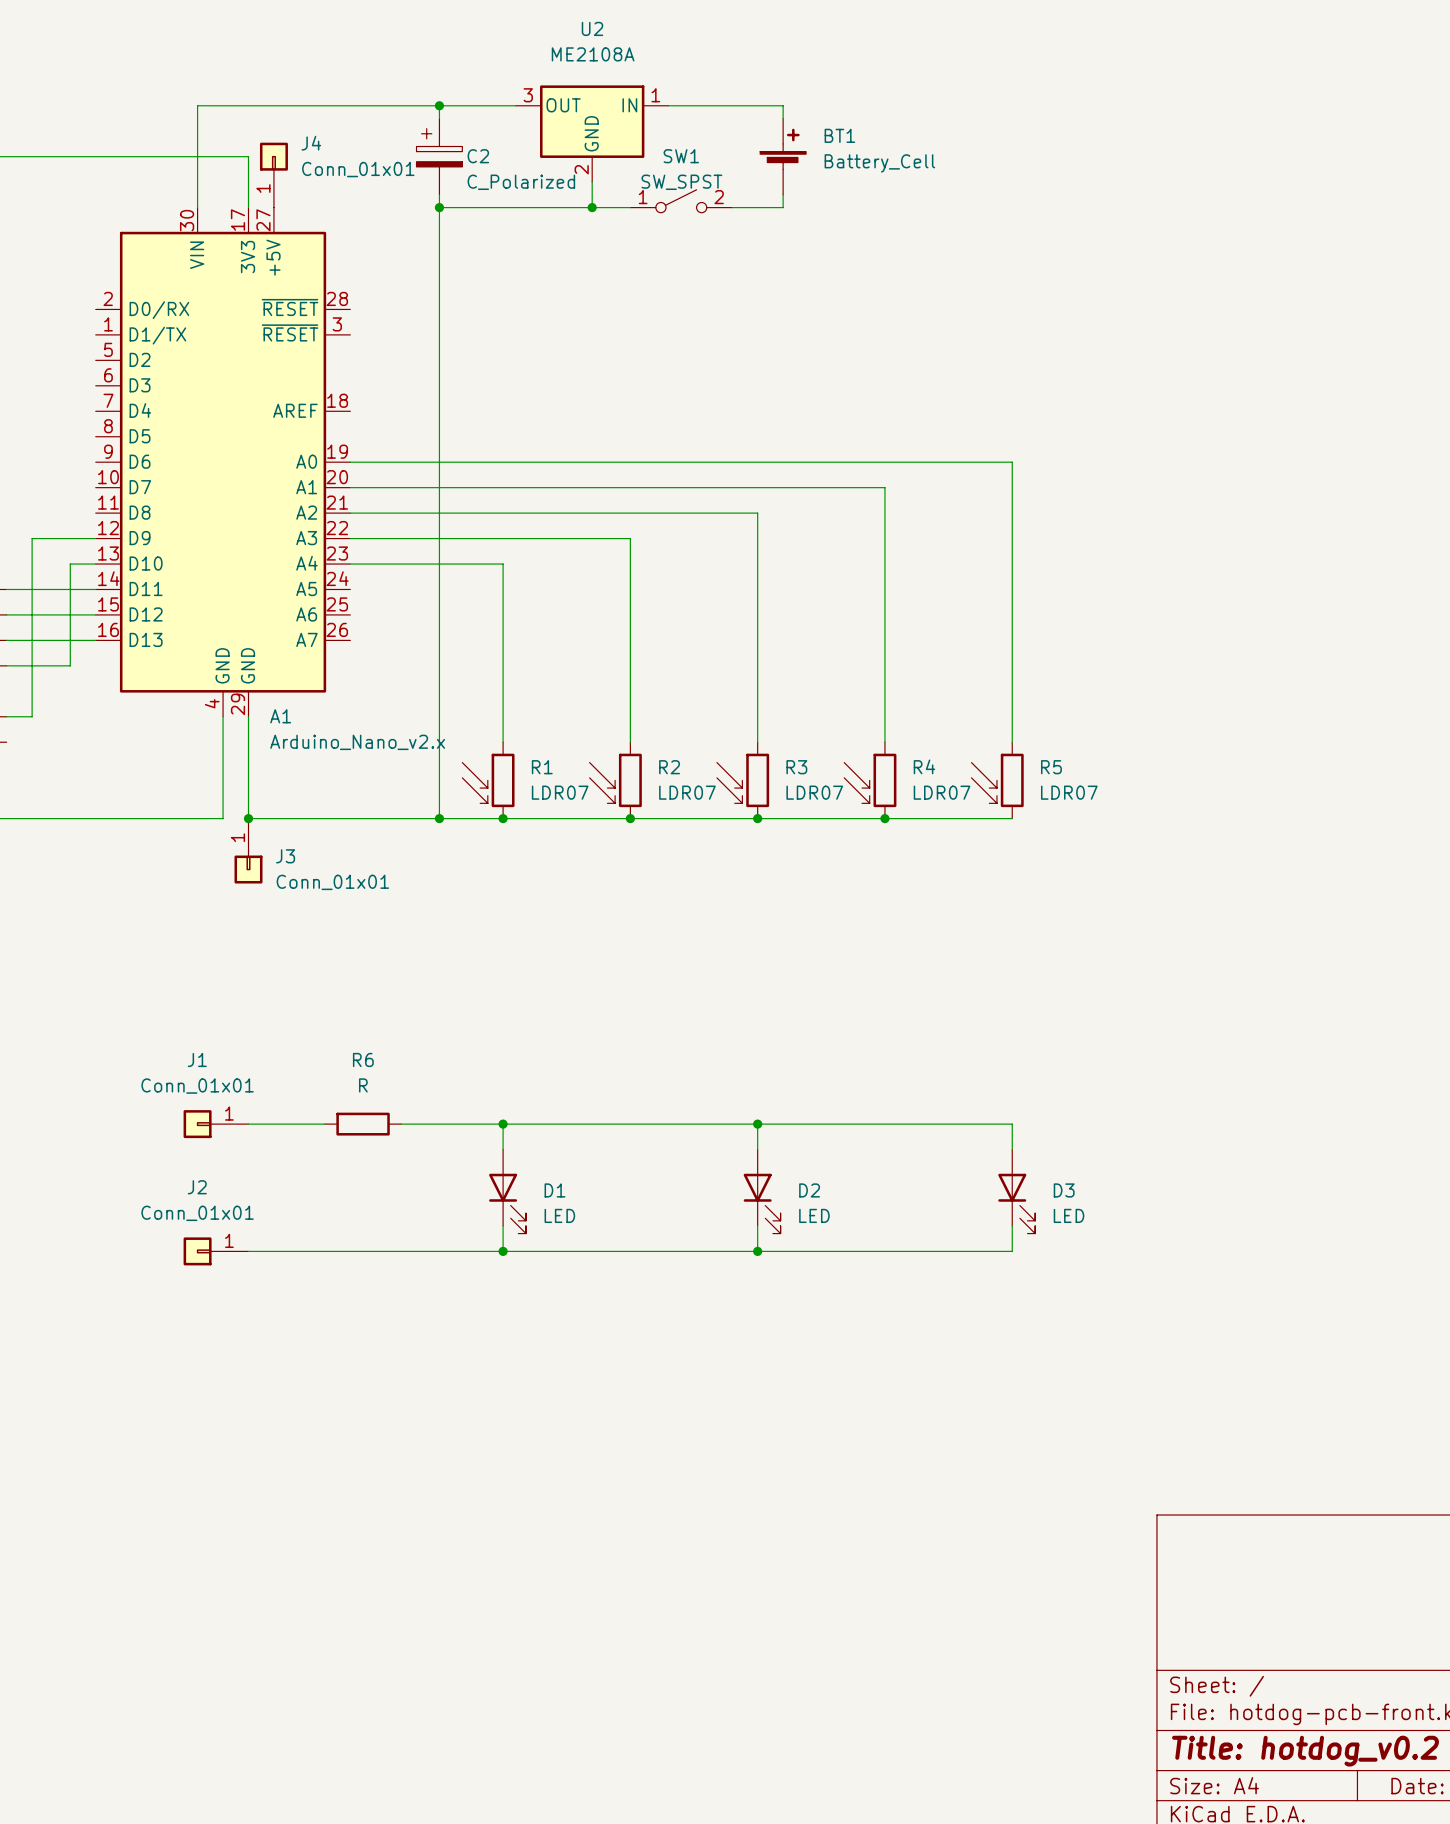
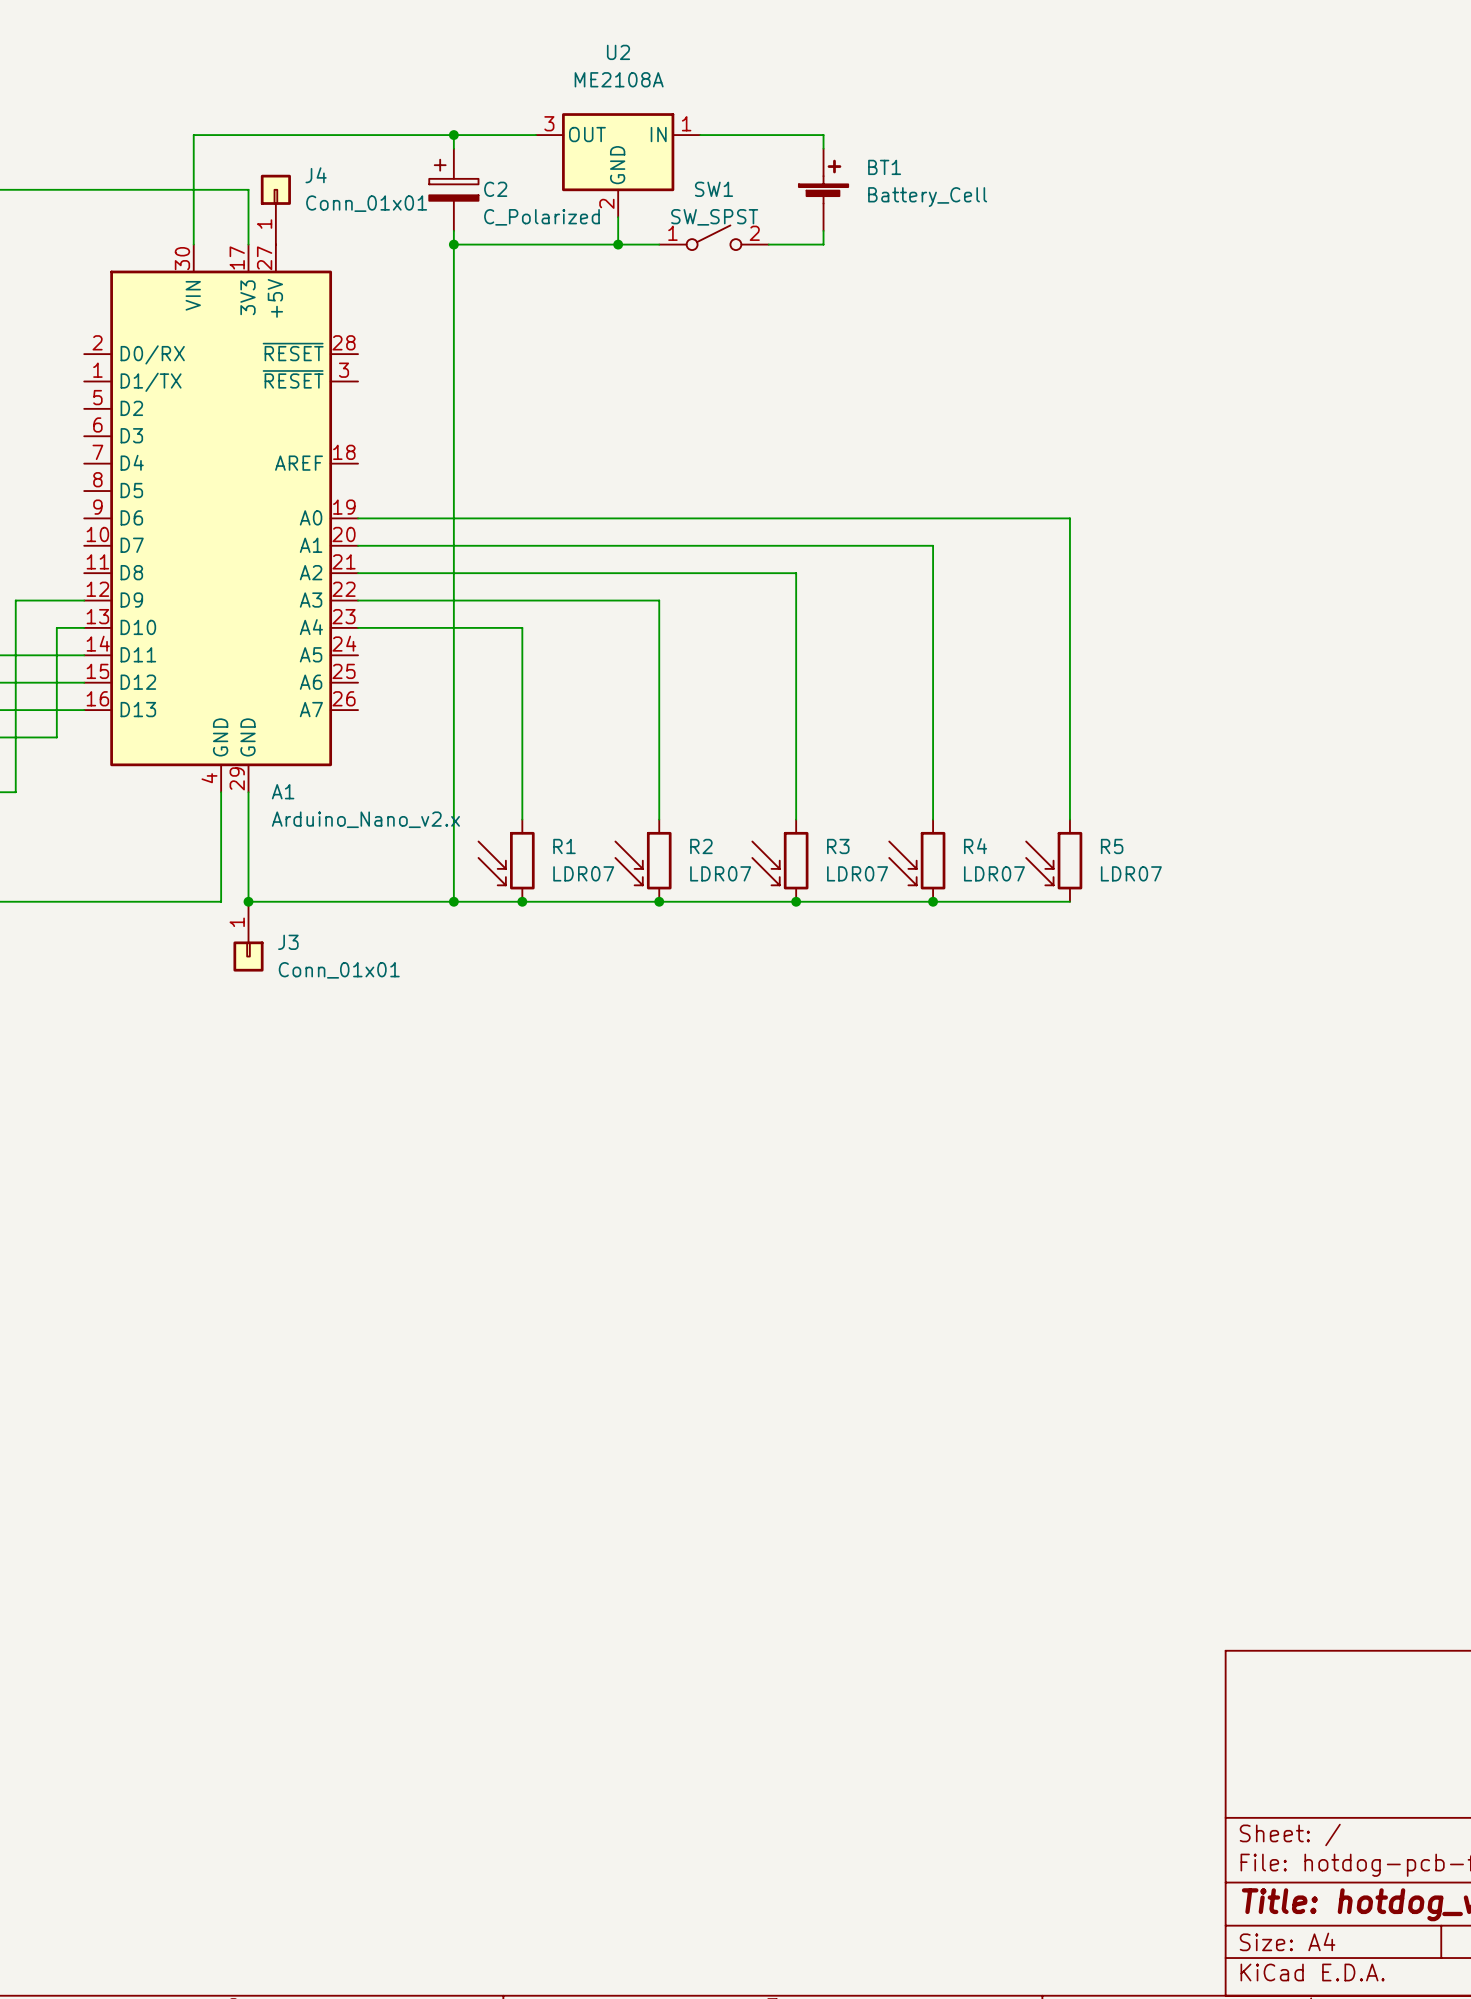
J1: Conn_01x01 (216, 1124) -> none
wire: (248, 1124) (324, 1124) -> none
R6: R (363, 1124) -> none
wire: (401, 1124) (1012, 1124) (1012, 1149) -> none
wire: (503, 1124) (503, 1149) -> none
junction: (503, 1124) -> none
wire: (757, 1124) (757, 1149) -> none
junction: (757, 1124) -> none
D1: LED (507, 1191) -> none
D2: LED (762, 1191) -> none
D3: LED (1016, 1191) -> none
wire: (503, 1225) (503, 1251) -> none
wire: (757, 1225) (757, 1251) -> none
wire: (1012, 1225) (1012, 1251) (248, 1251) -> none
J2: Conn_01x01 (216, 1251) -> none
junction: (503, 1251) -> none
junction: (757, 1251) -> none

